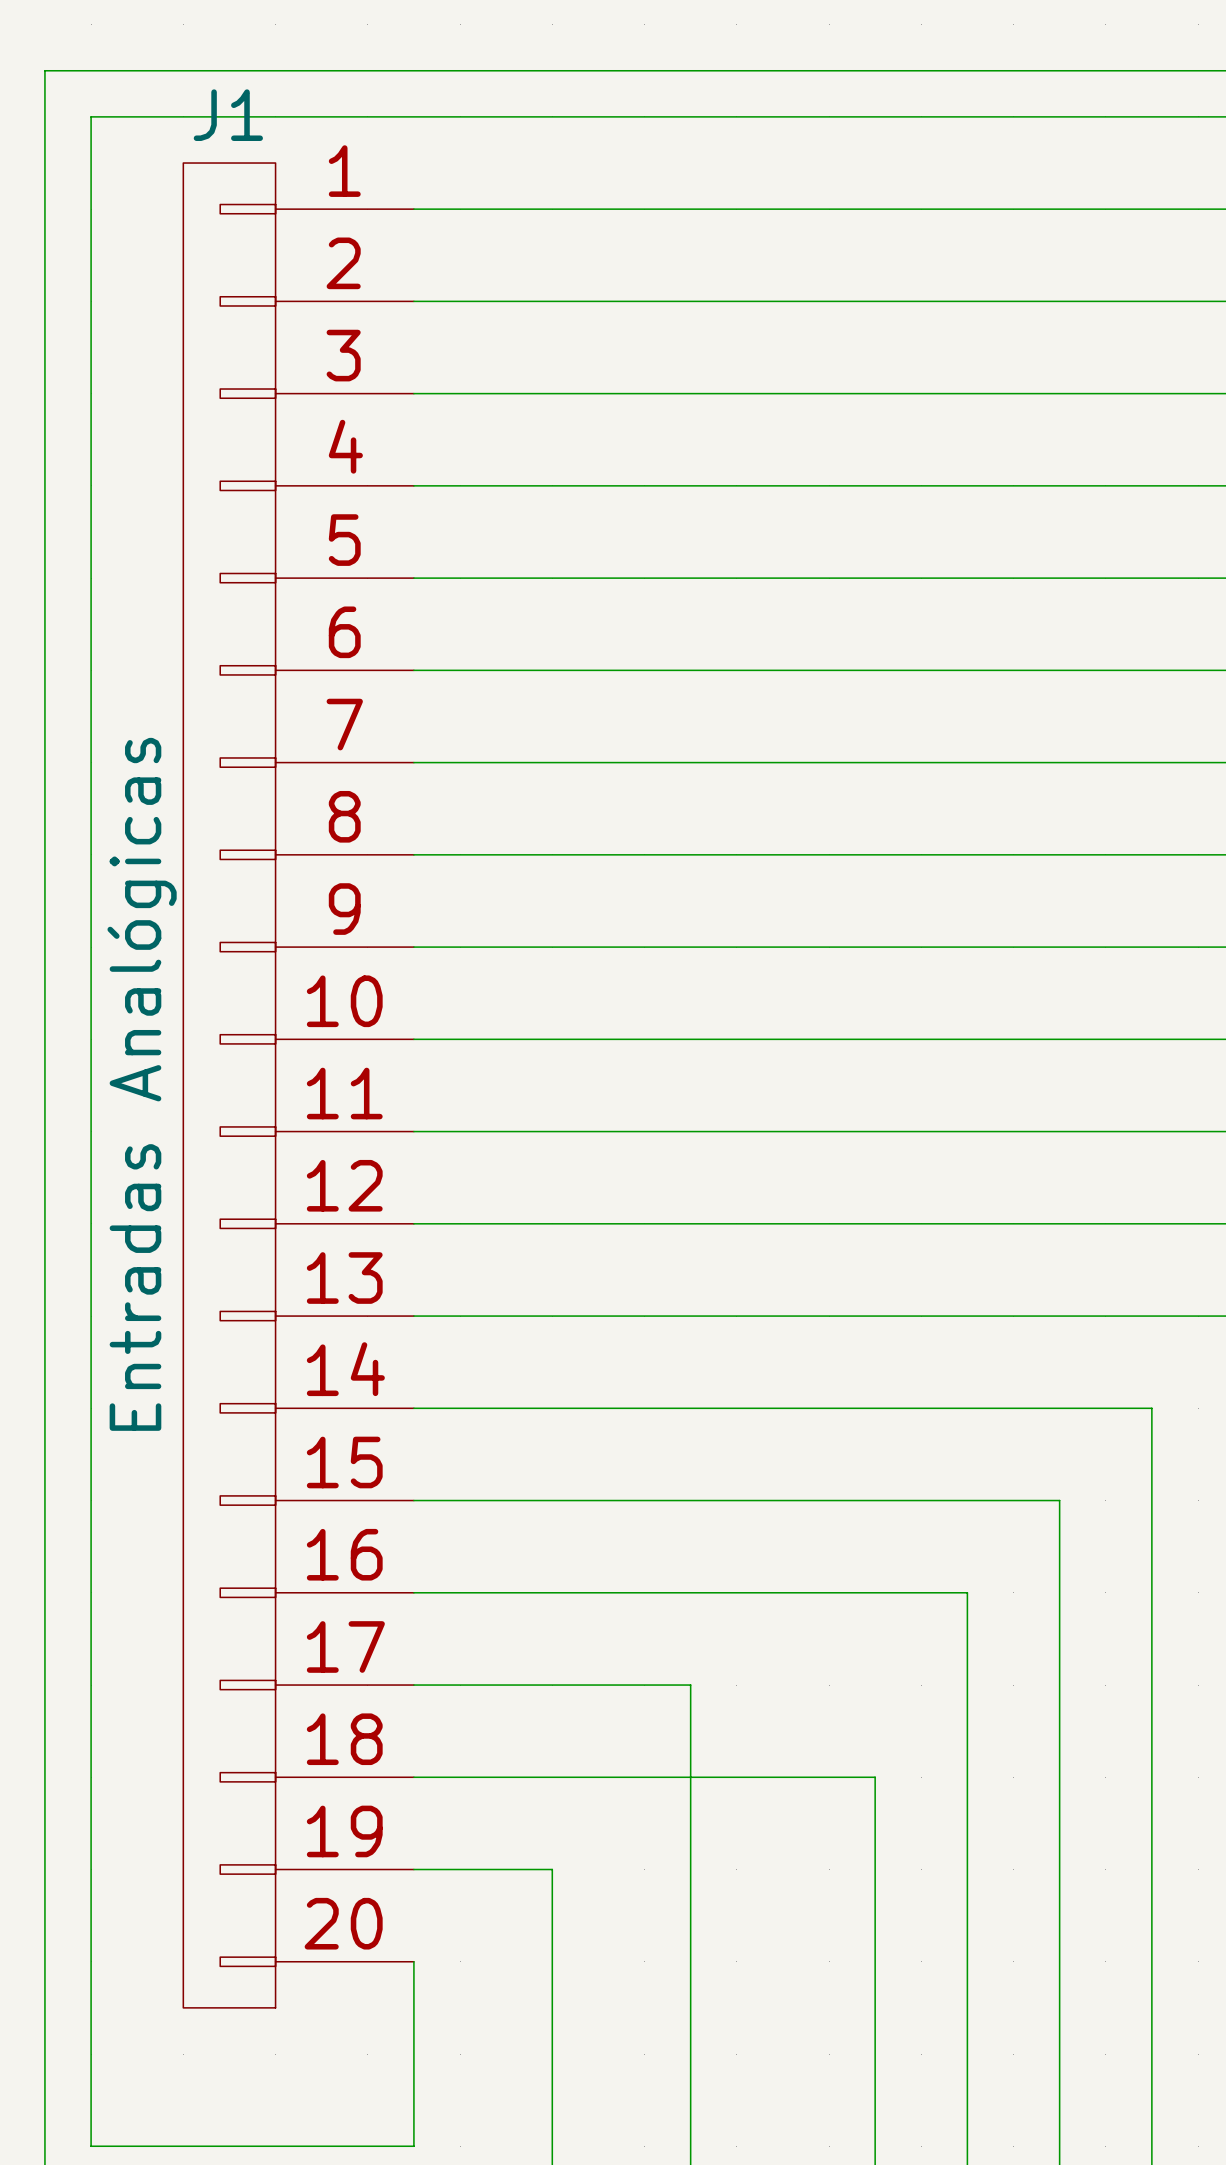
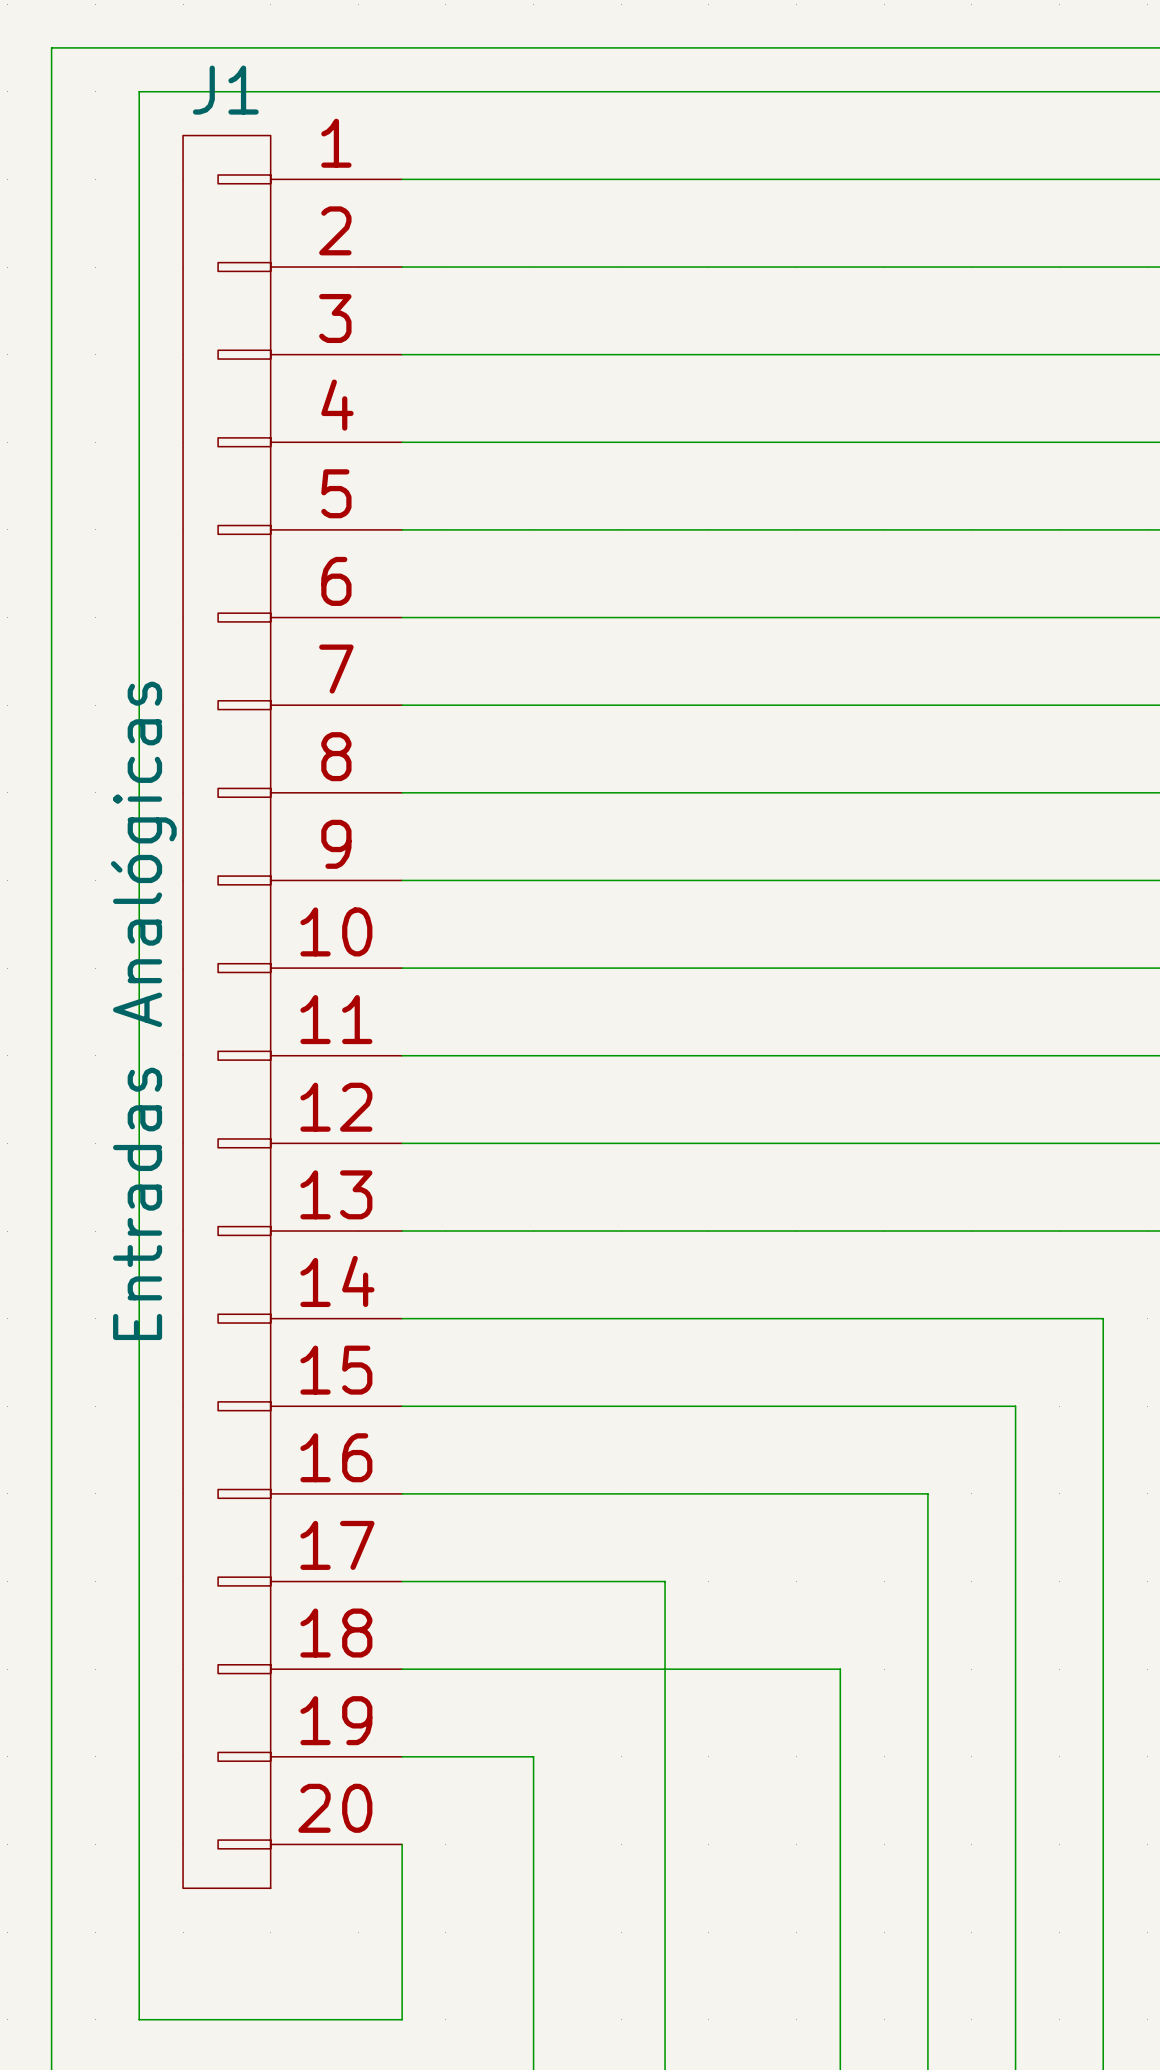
wire: (137, 116) (91, 116) (91, 2146) (137, 2146) -> (139, 91) (139, 2019)

